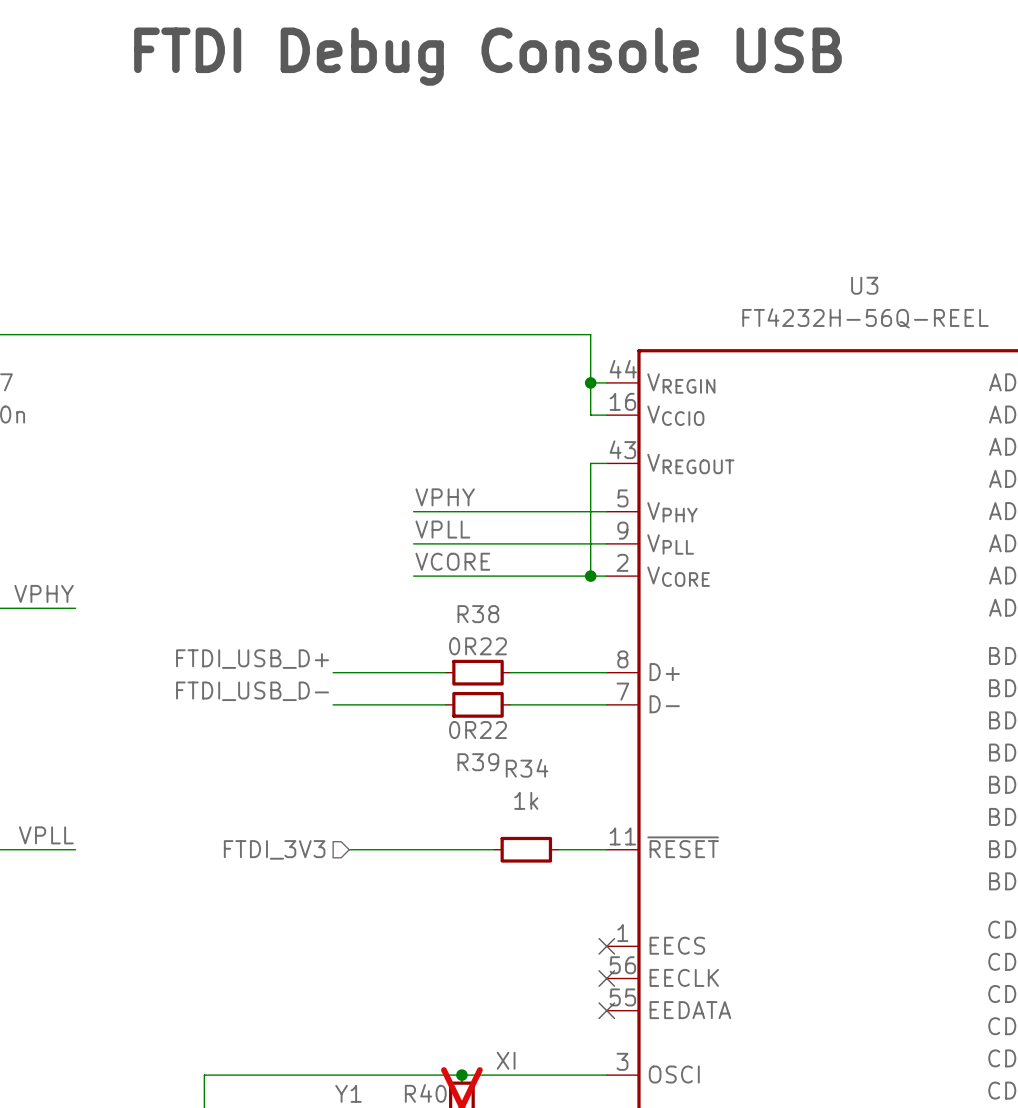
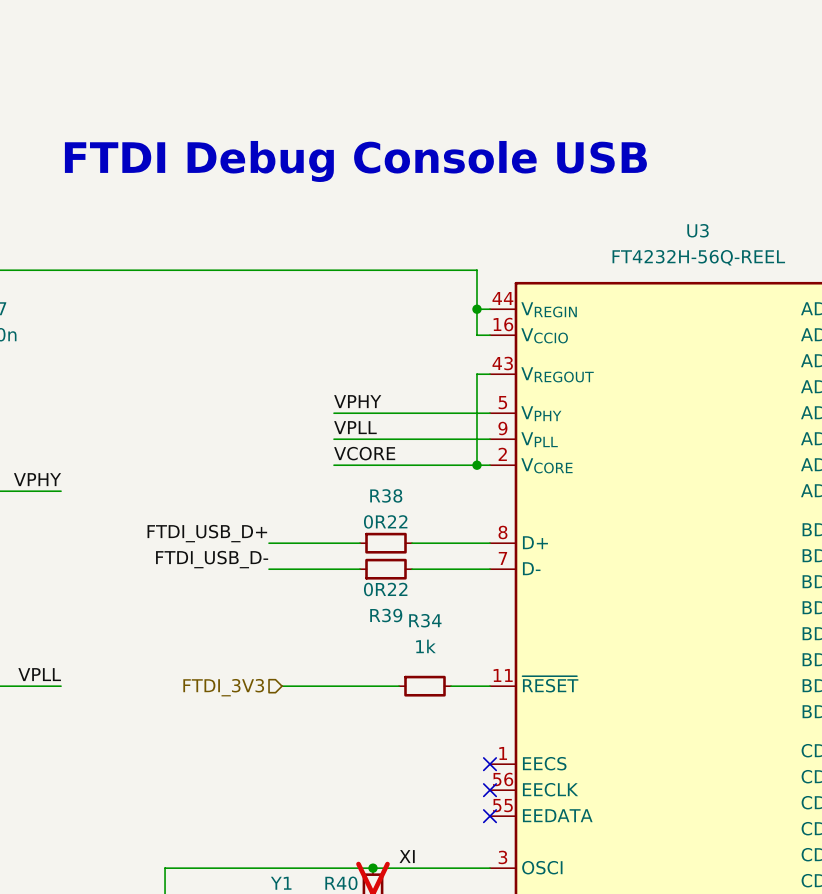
text position: FTDI Debug Console USB (487, 56) -> FTDI Debug Console USB (355, 161)

